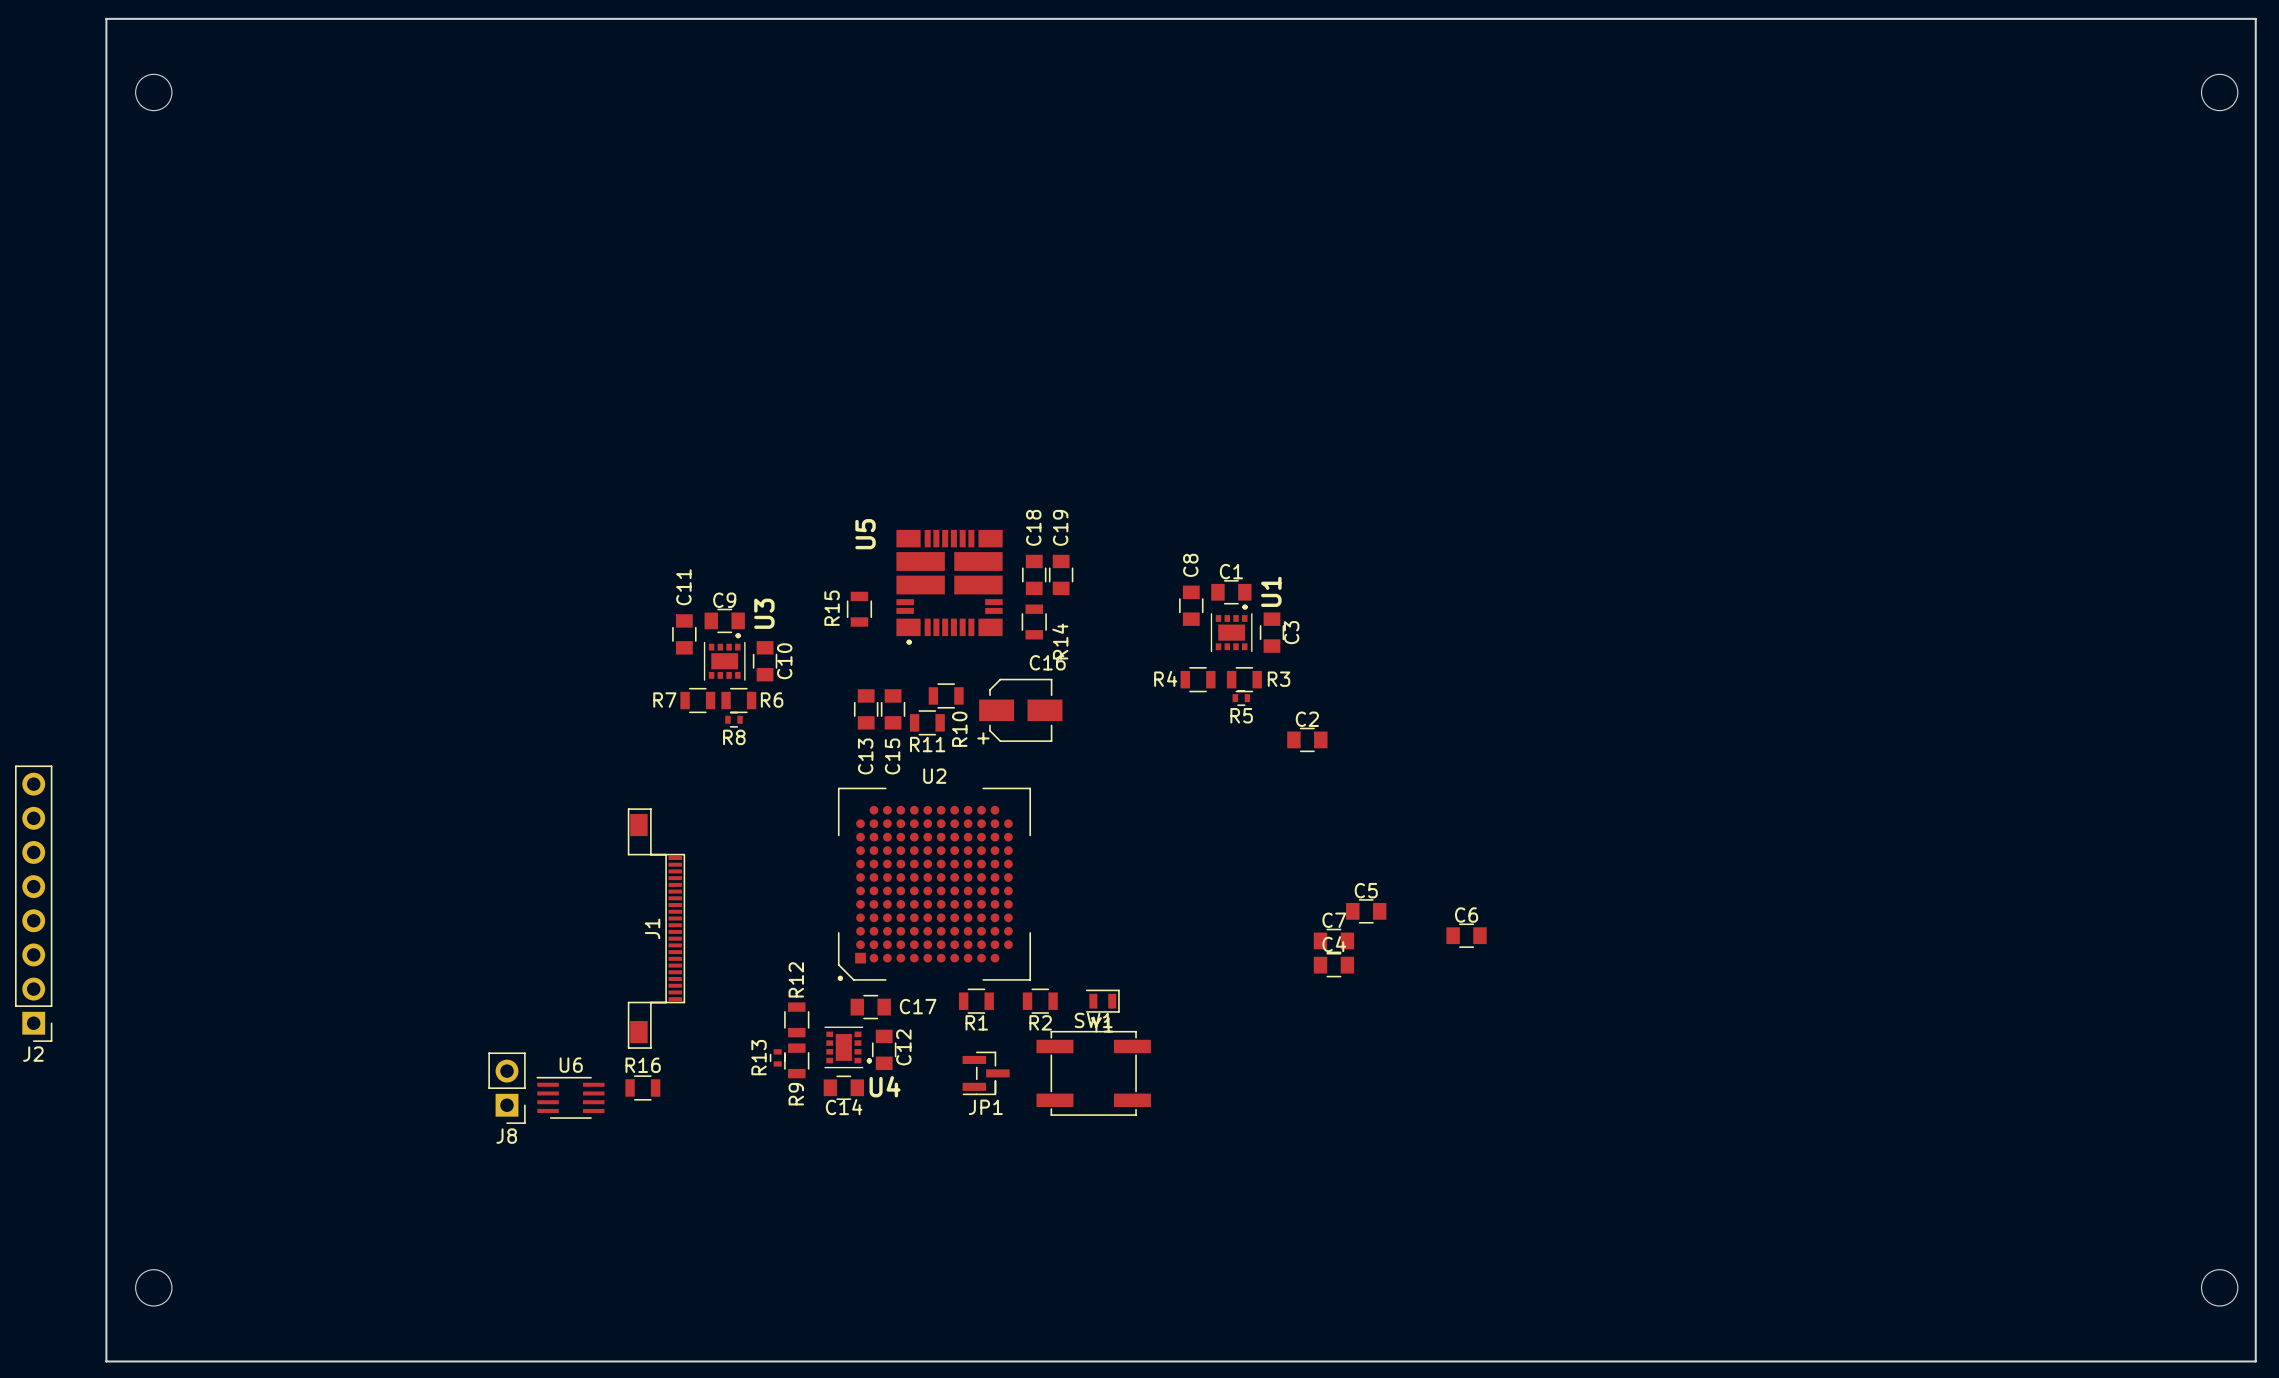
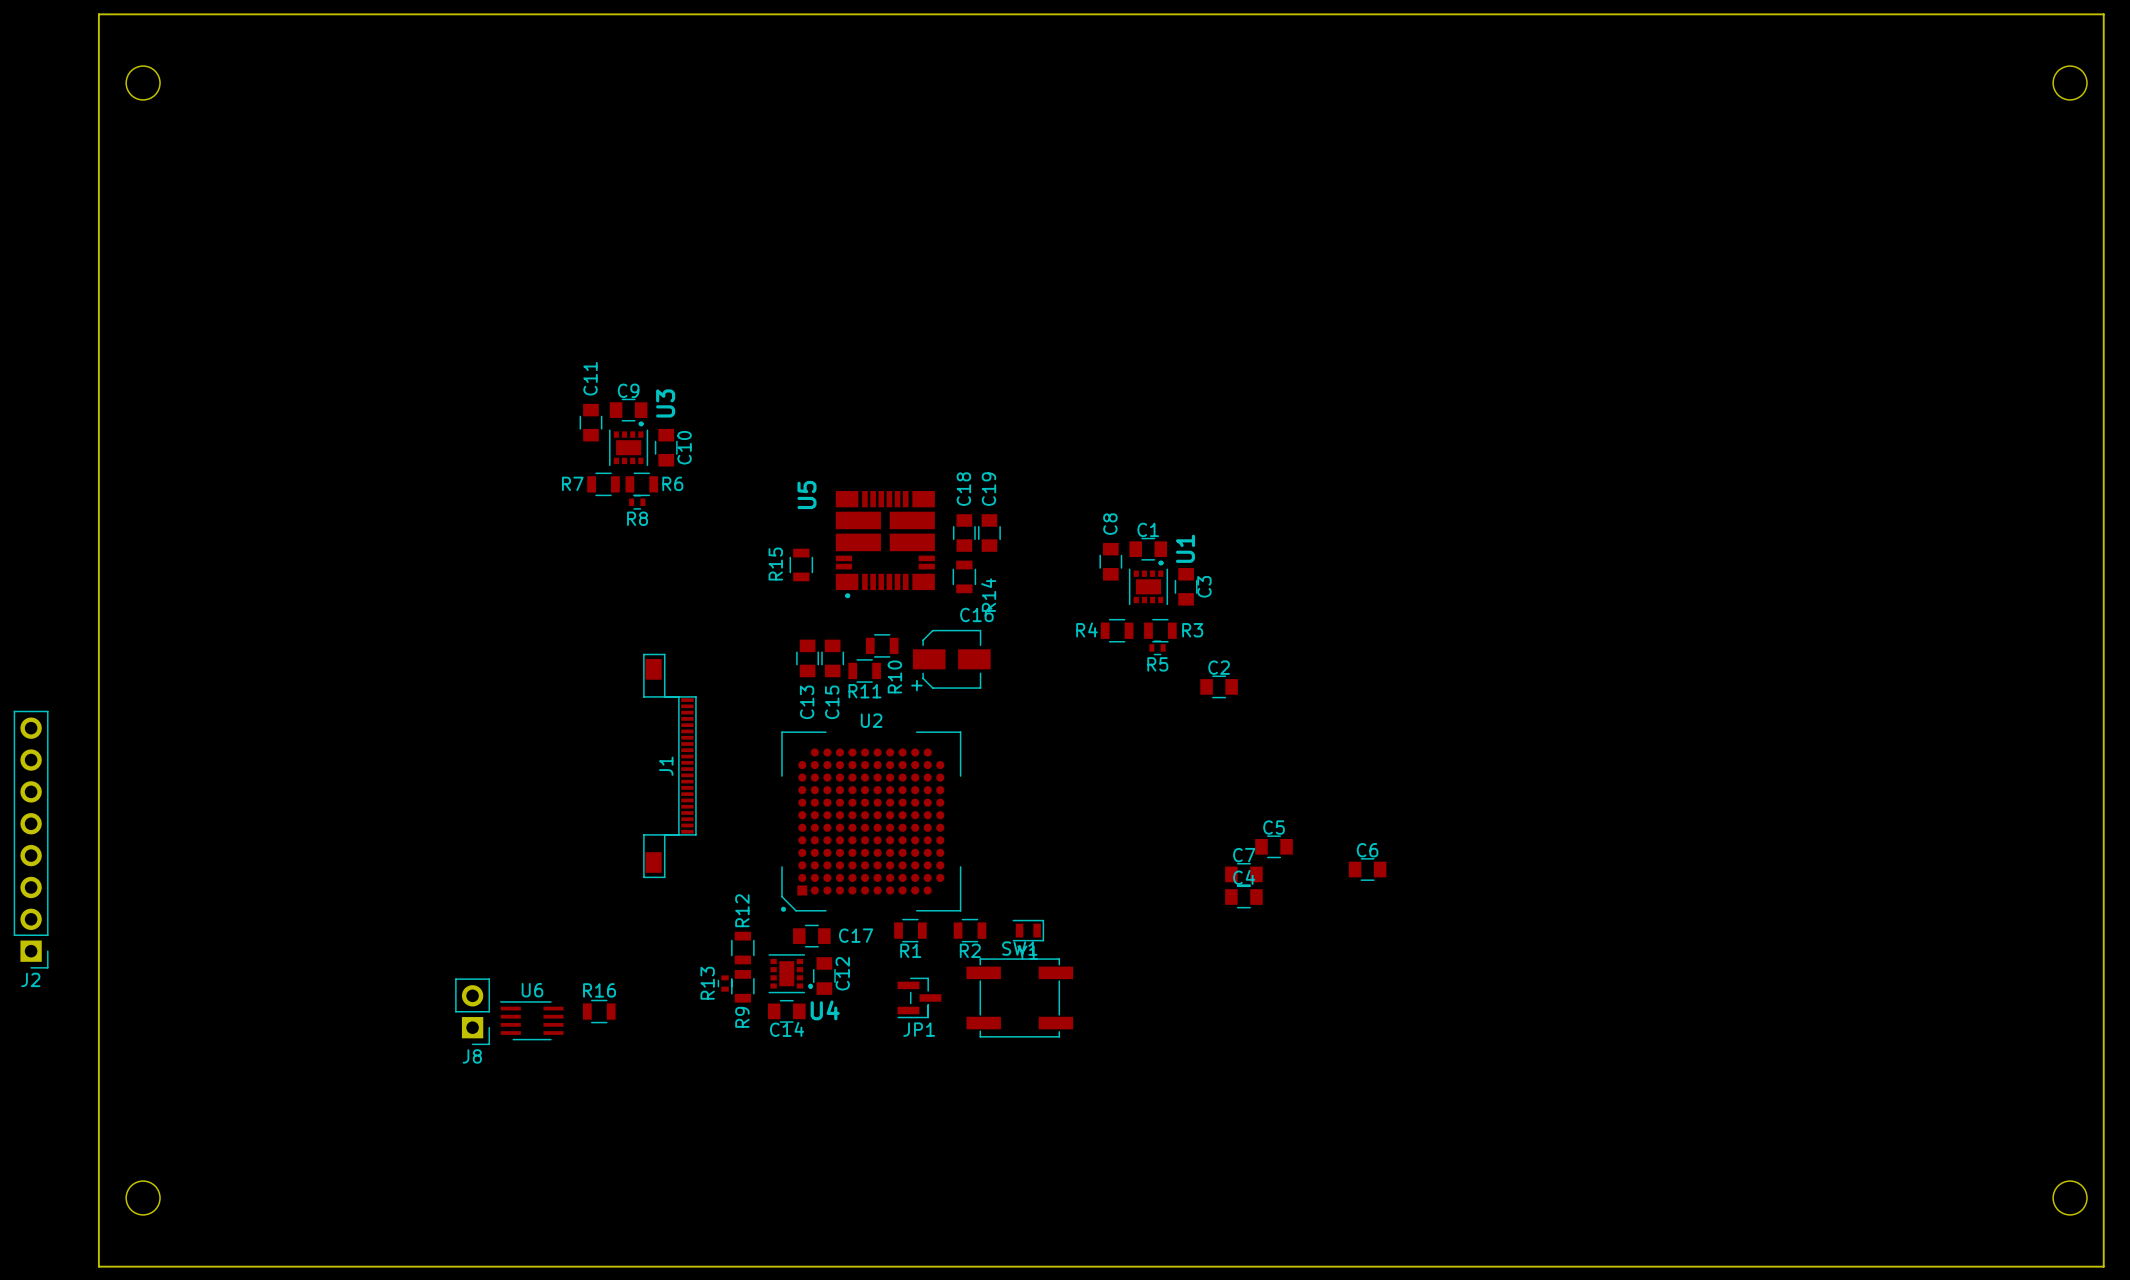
C9 position: (724, 620) -> (628, 410)
C11 position: (684, 634) -> (590, 422)
U3 position: (724, 656) -> (628, 443)
C10 position: (765, 661) -> (666, 447)
R7 position: (697, 700) -> (603, 484)
R6 position: (738, 700) -> (641, 484)
R8 position: (733, 719) -> (637, 502)
J1 position: (656, 928) -> (669, 765)

